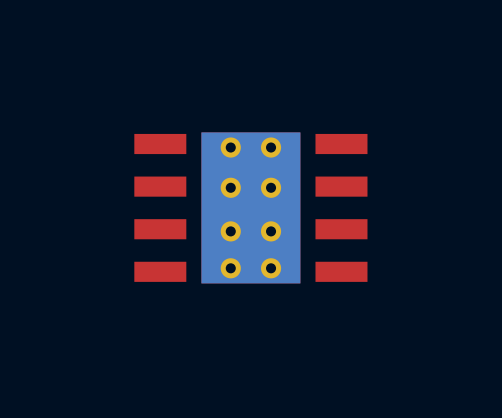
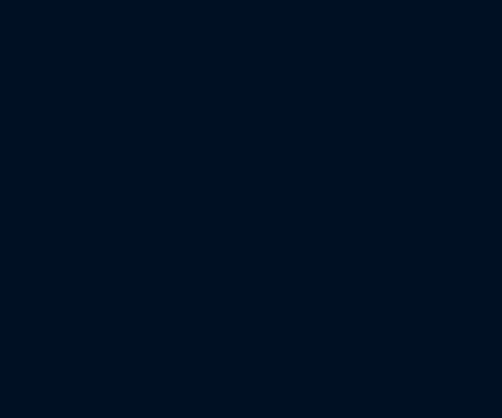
part: (250, 207) -> none

